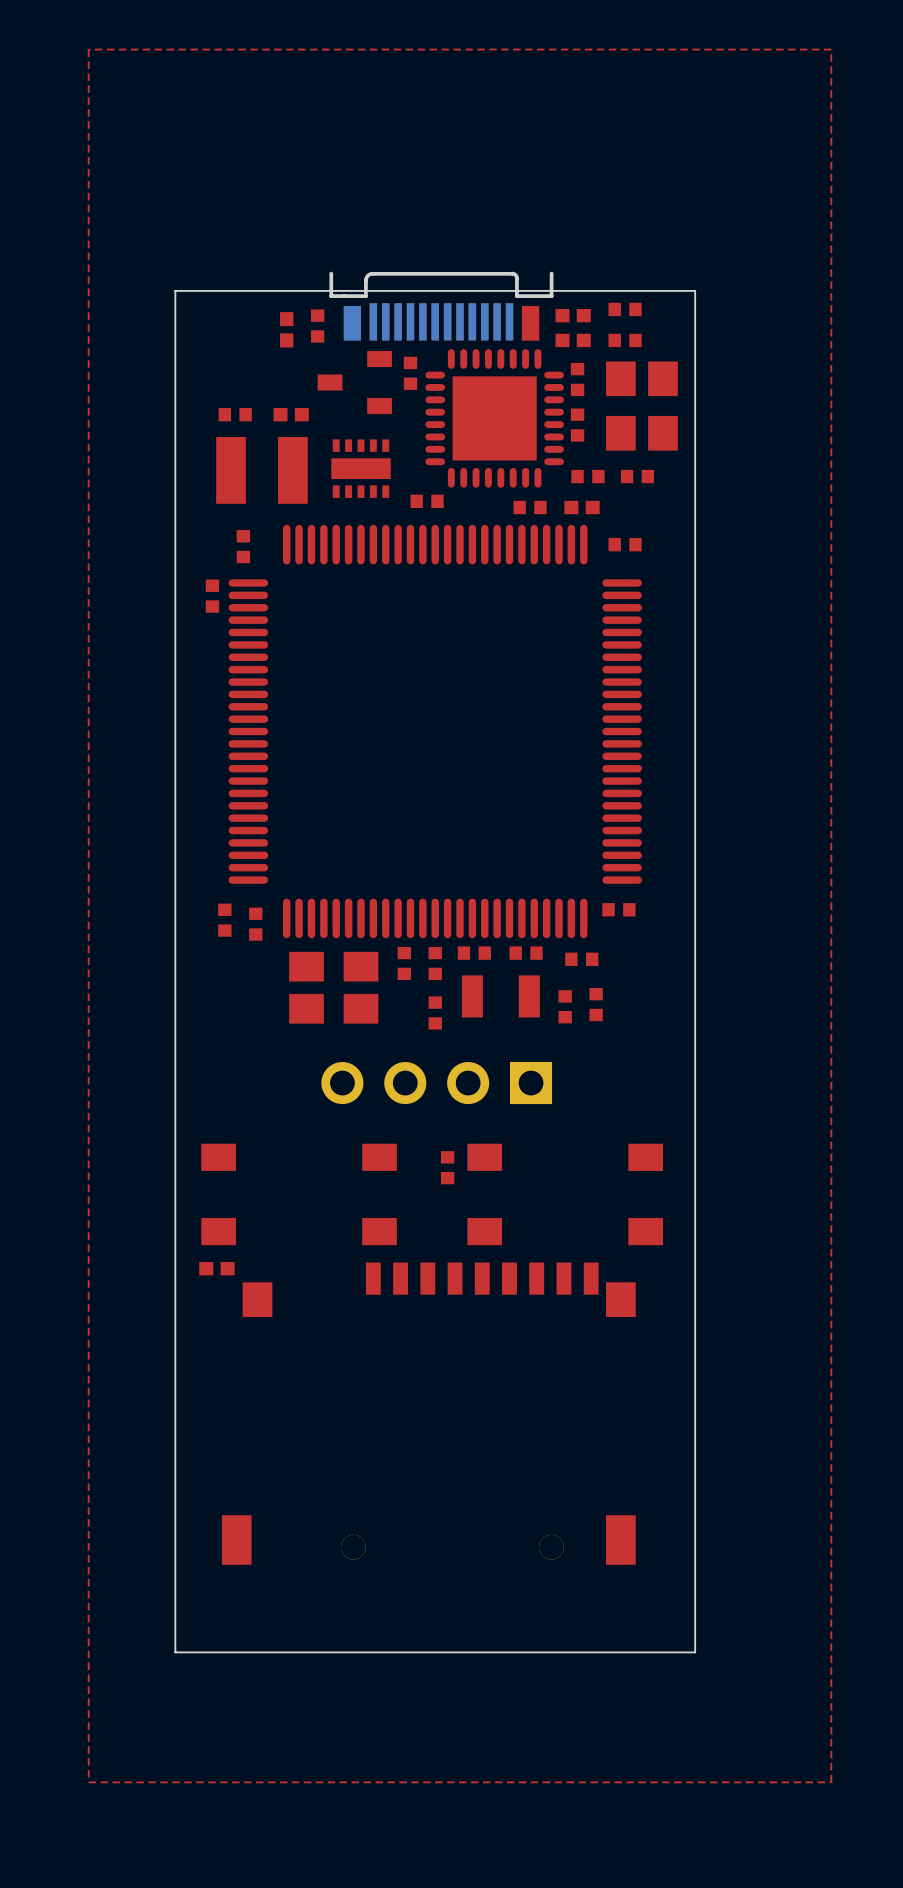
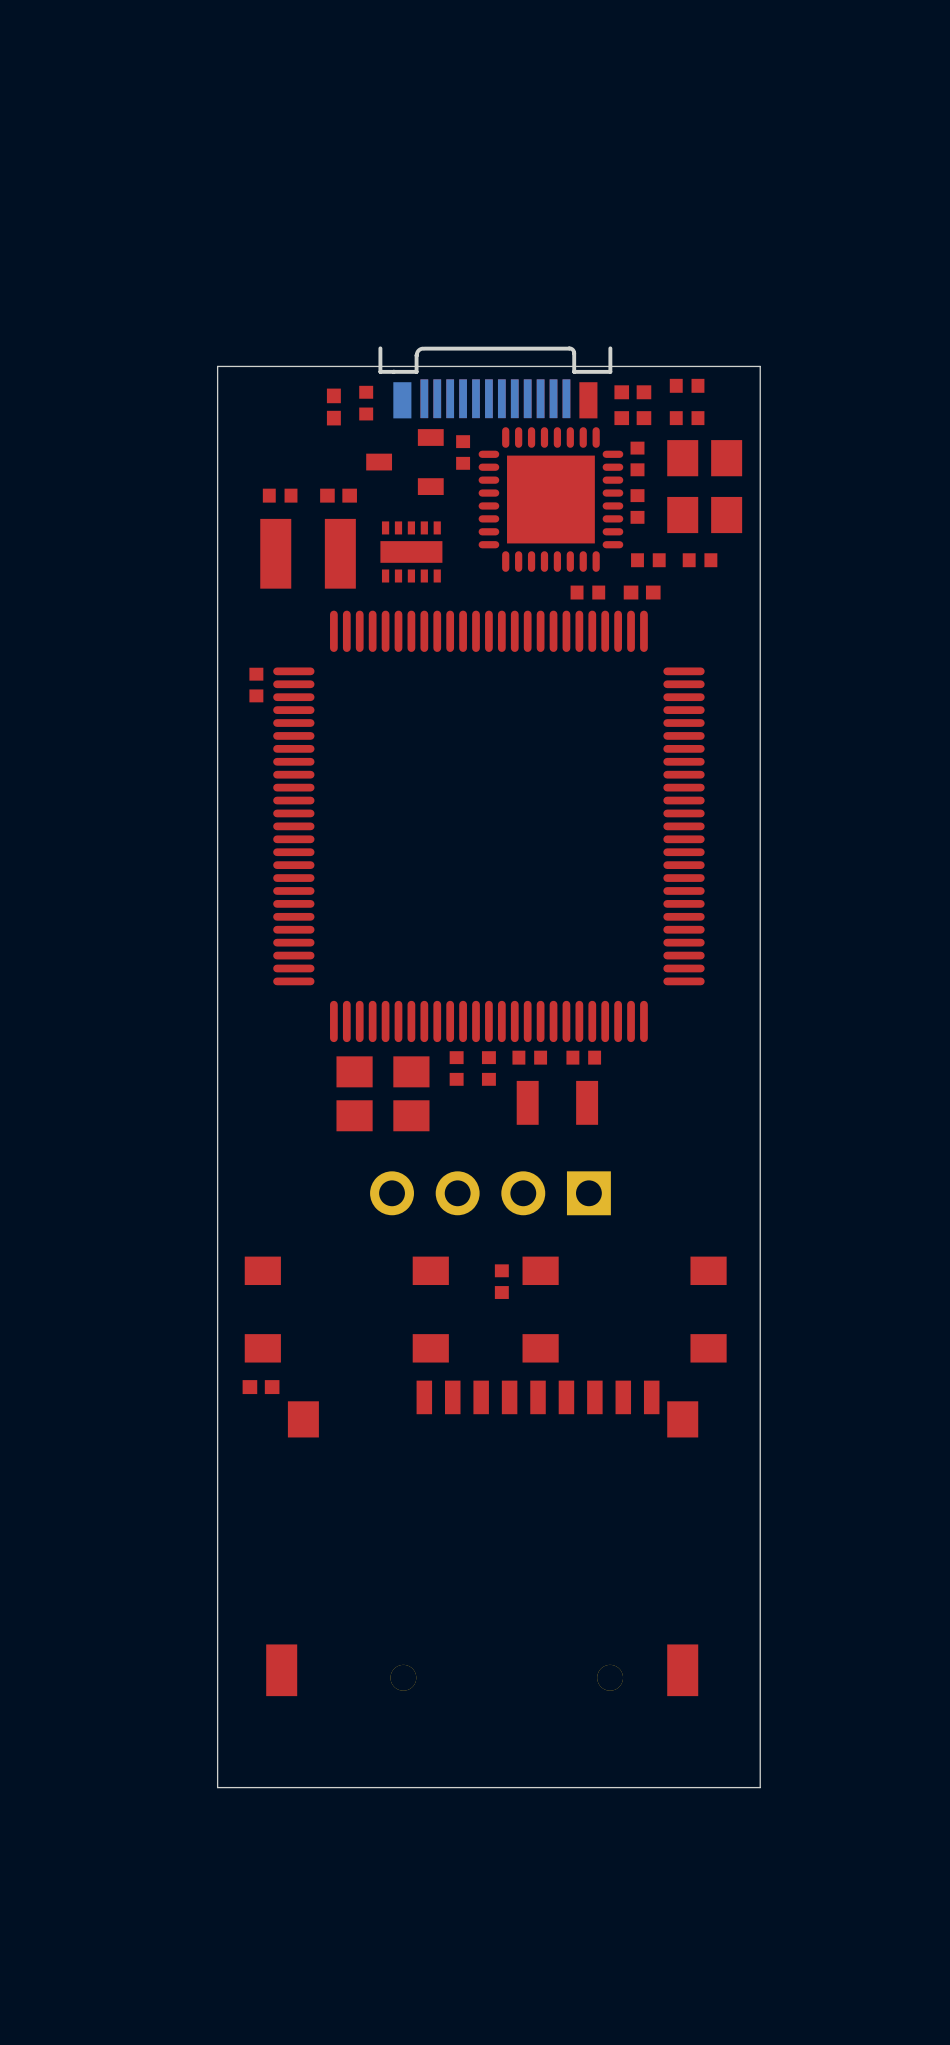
top zone outline: (831, 49) (88, 49) (88, 1782) (831, 1782) (831, 49) -> none
part: (427, 501) -> none
part: (625, 544) -> none
part: (243, 546) -> none
part: (618, 909) -> none
part: (224, 920) -> none
part: (255, 924) -> none
part: (581, 959) -> none
part: (596, 1004) -> none
part: (565, 1006) -> none
part: (435, 1012) -> none

